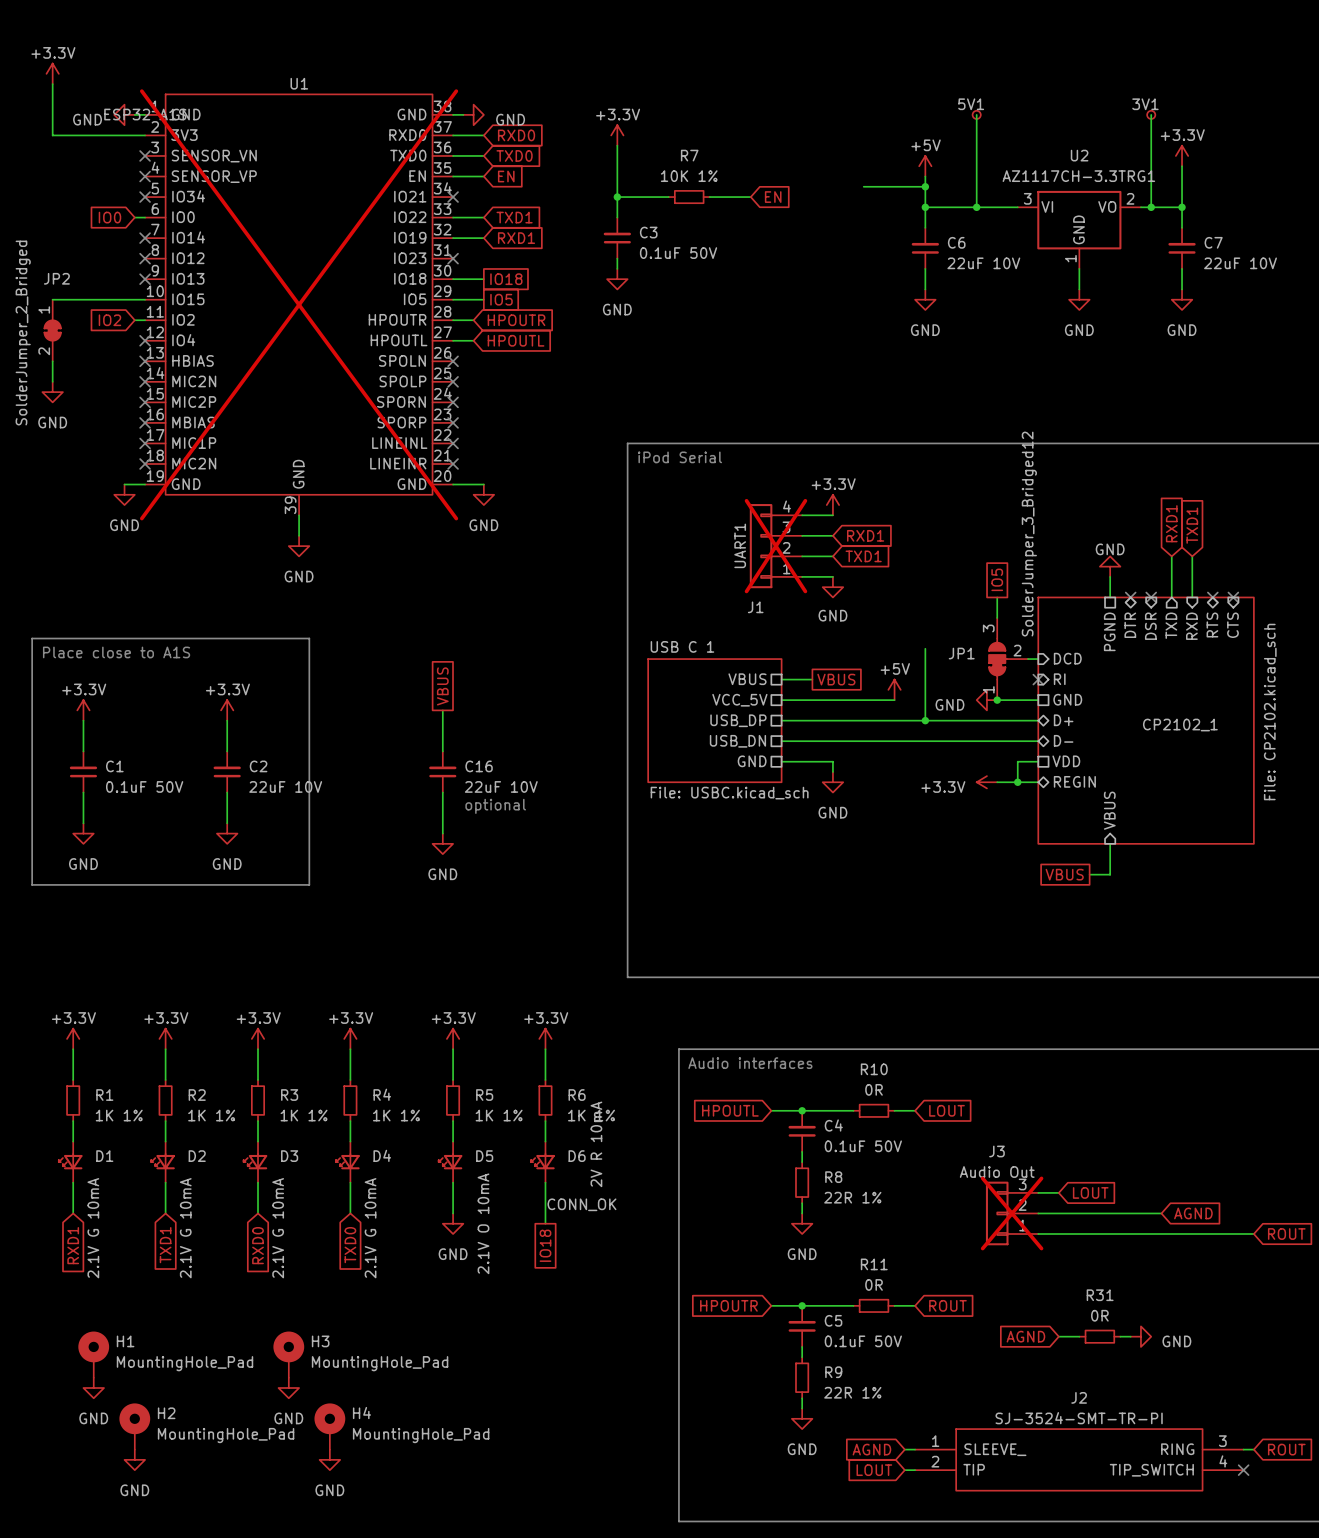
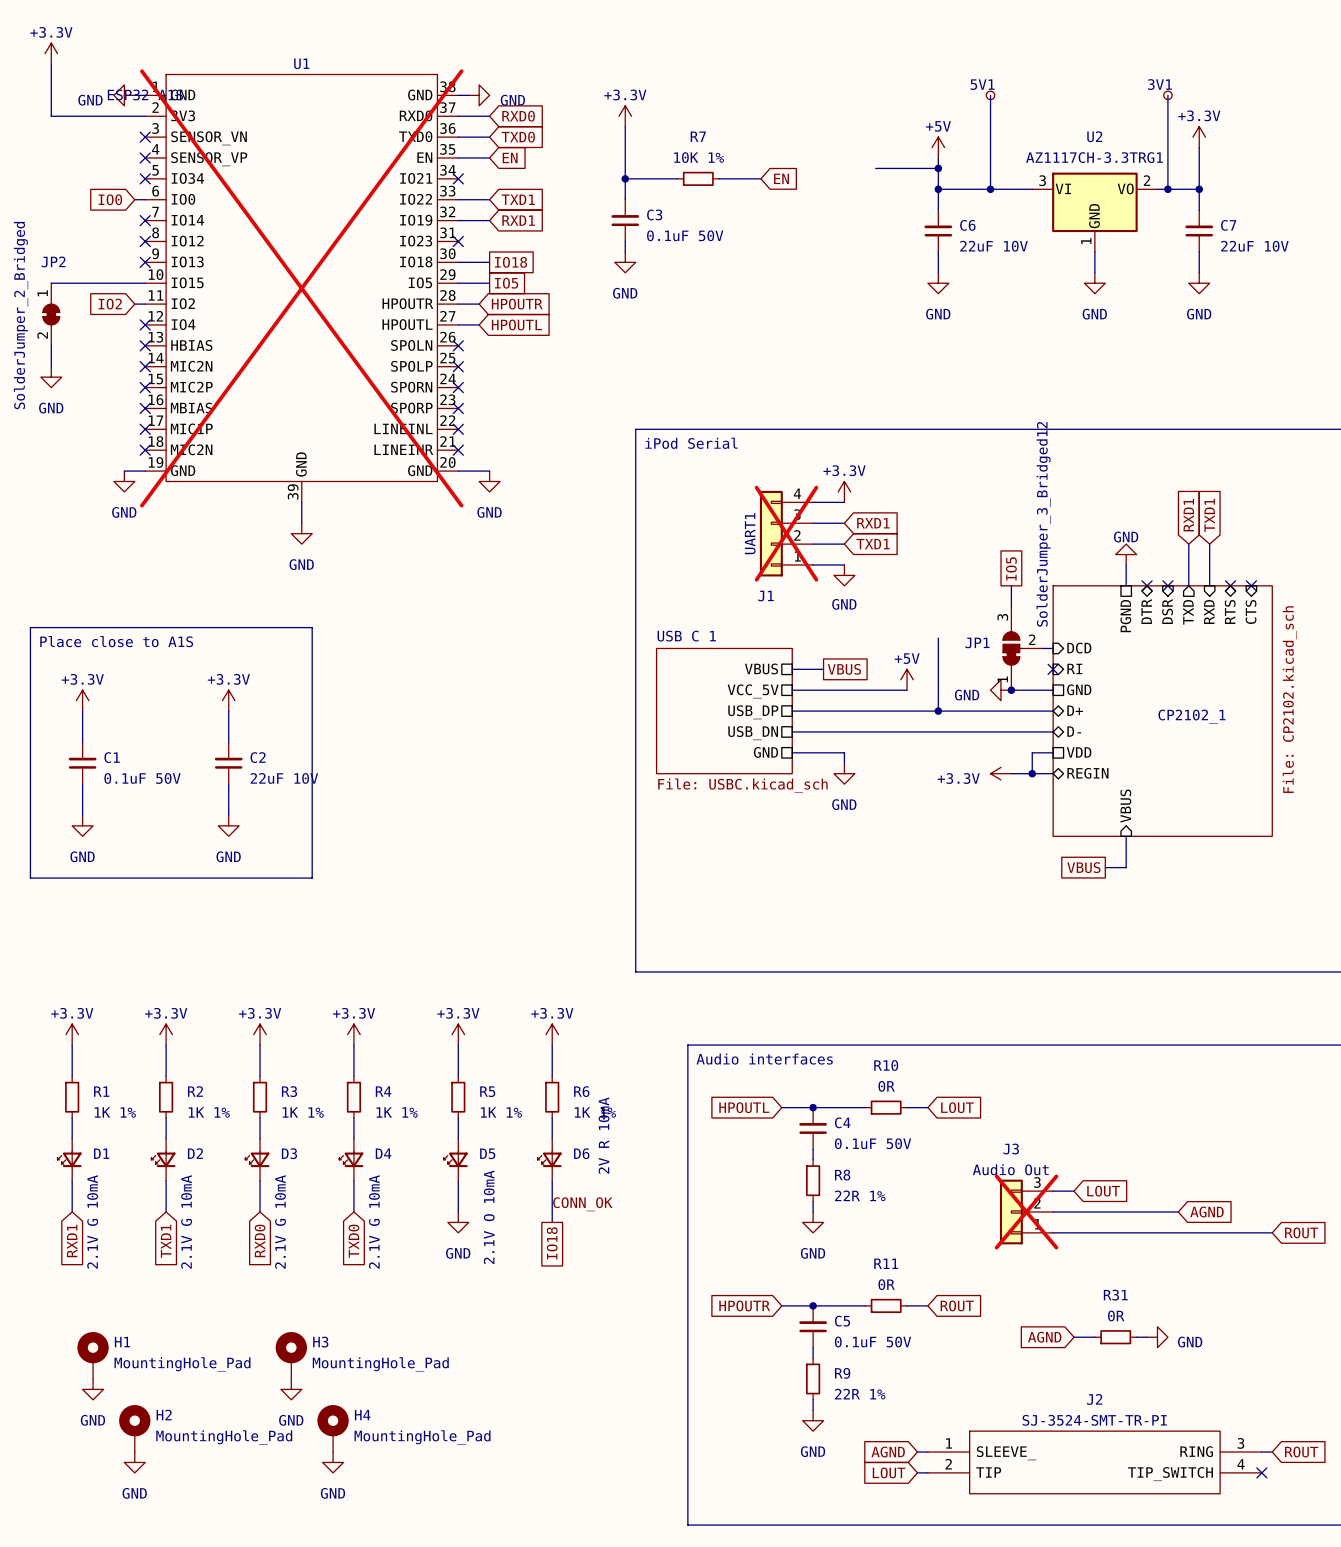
global label: VBUS (442, 686) -> none
wire: (442, 710) (442, 751) -> none
C16: 22uF 10V (442, 771) -> none
wire: (442, 792) (442, 833) -> none
text: optional (495, 806) -> none
power symbol: GND (442, 843) -> none

